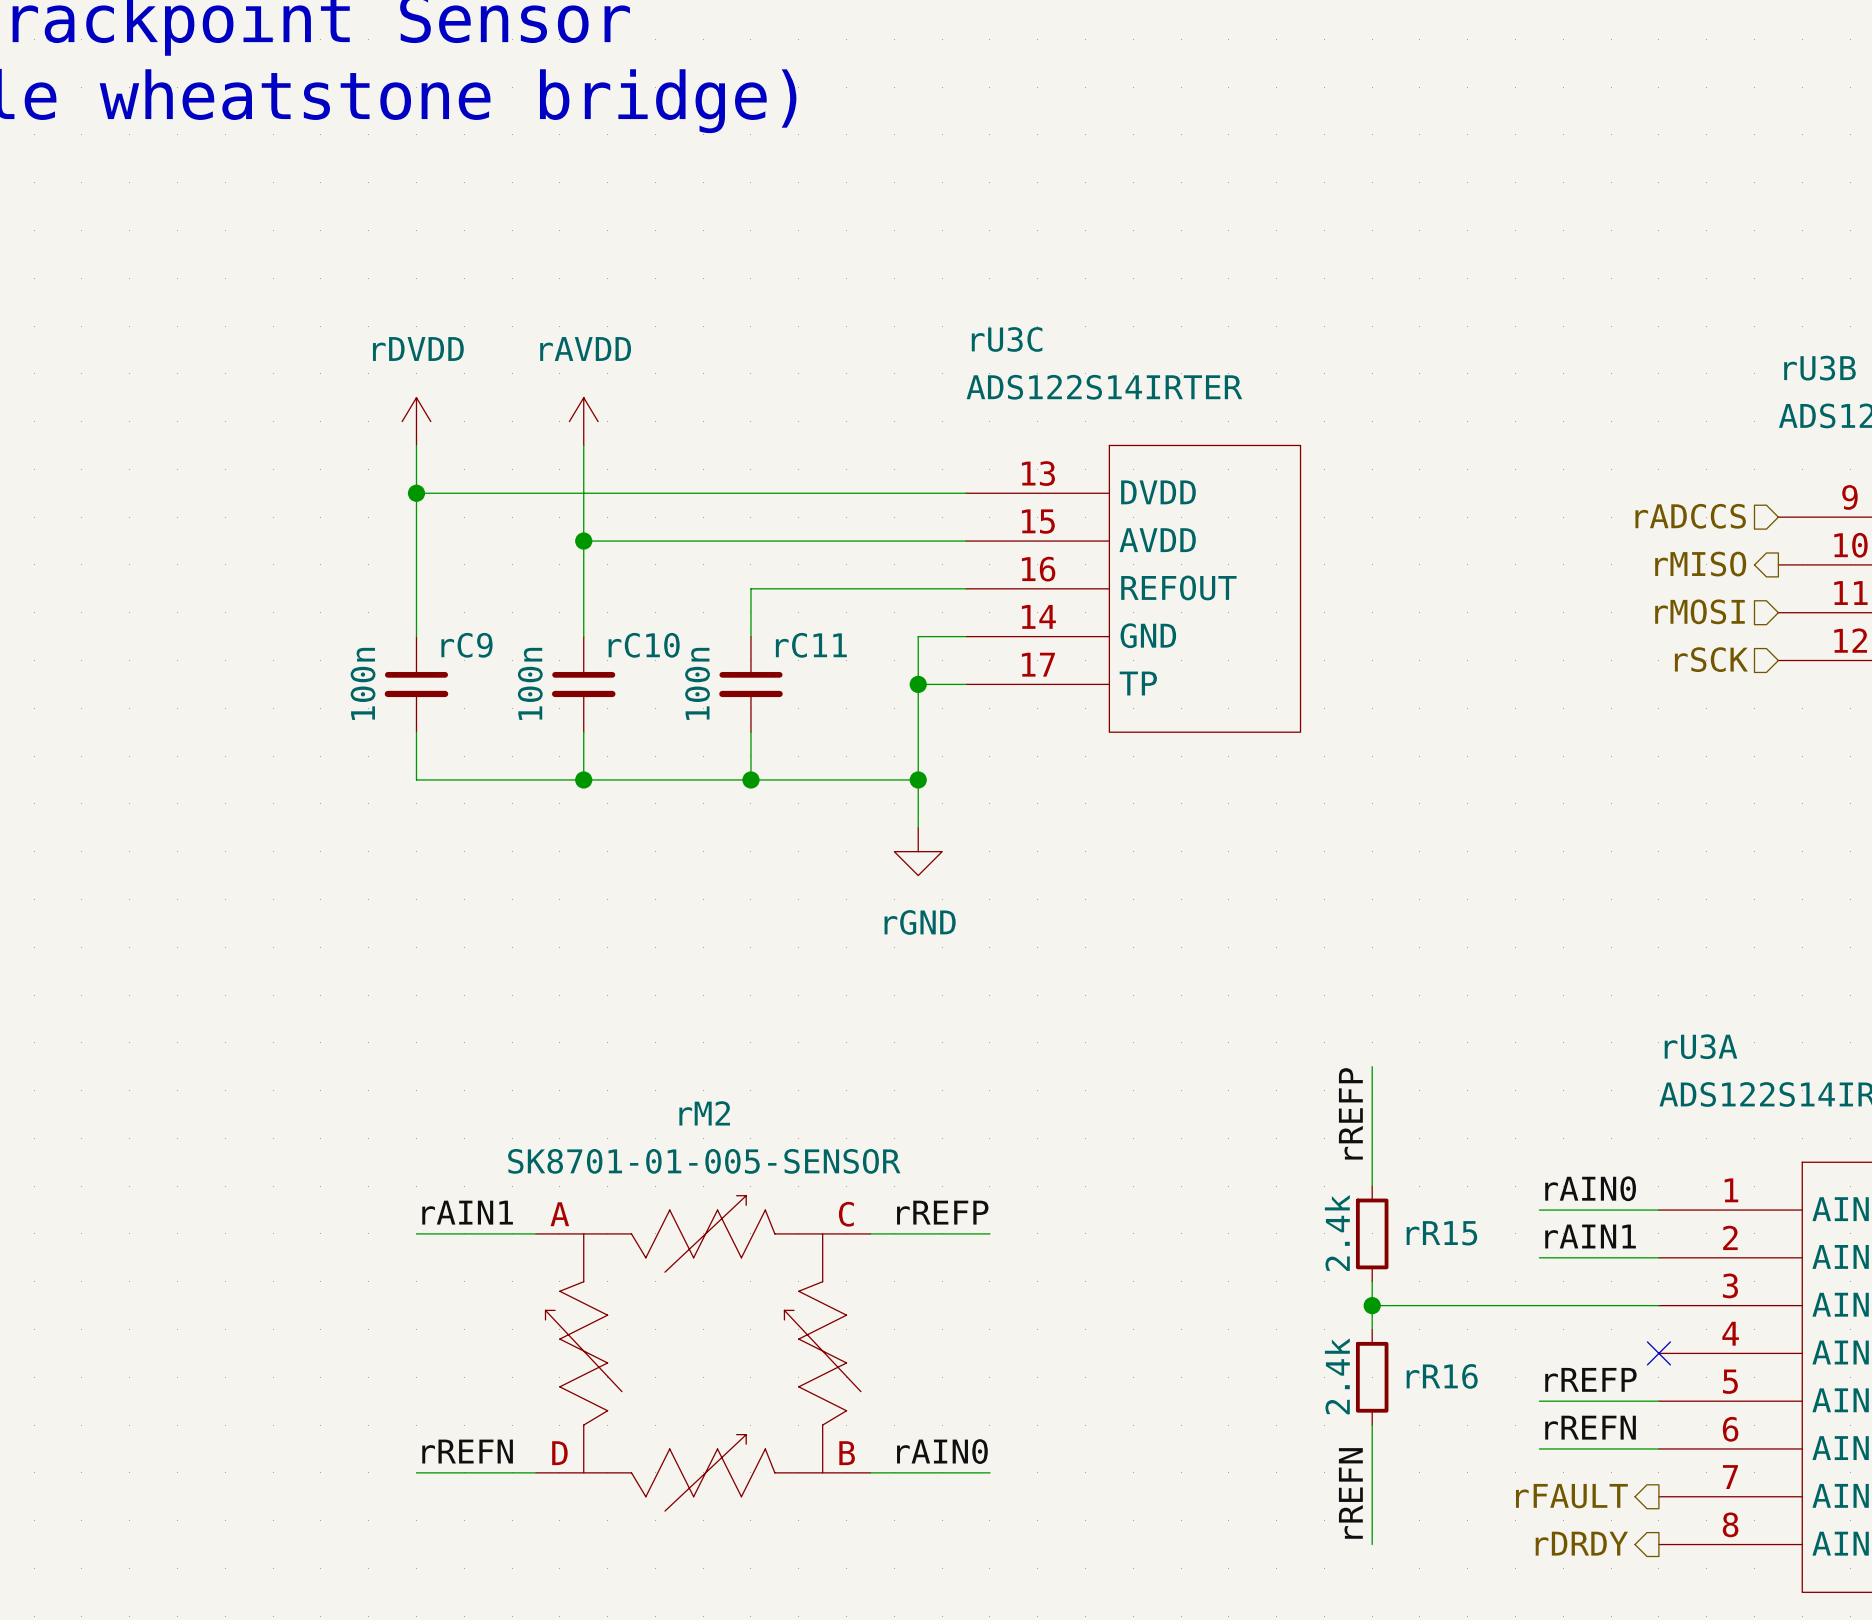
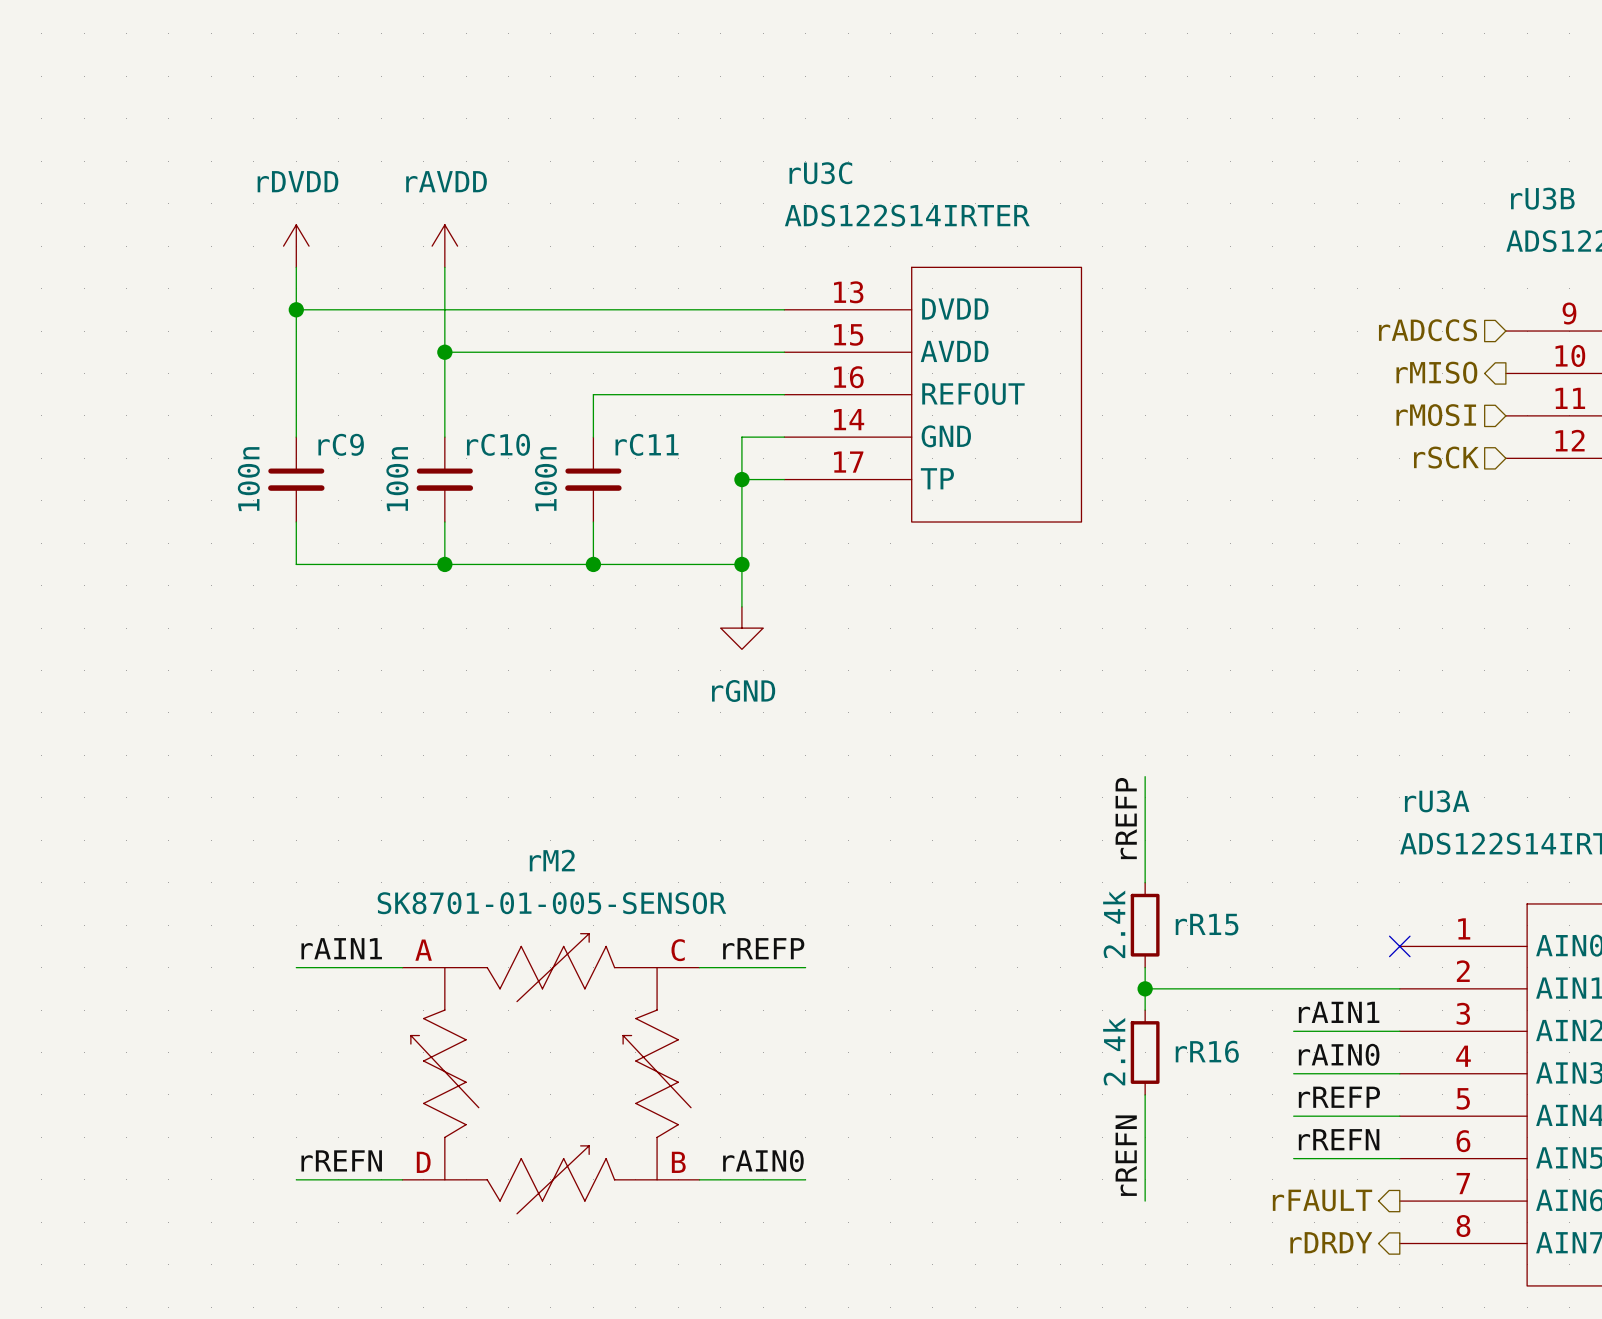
label position: rREFP (1350, 1113) -> rREFP (1126, 818)
wire: (1372, 1138) (1372, 1186) -> (1145, 776) (1145, 819)
label position: rAIN0 (1590, 1188) -> rAIN0 (1339, 1054)
wire: (1539, 1210) (1658, 1210) -> (1293, 1073) (1399, 1073)
no-connect mark: none -> (1399, 946)
rR15 position: (1372, 1233) -> (1145, 925)
label position: rAIN1 (1590, 1236) -> rAIN1 (1339, 1012)
wire: (1372, 1281) (1372, 1329) -> (1145, 1010) (1145, 967)
wire: (1372, 1305) (1539, 1305) -> (1145, 988) (1293, 988)
junction position: (1372, 1305) -> (1145, 988)
no-connect mark: (1658, 1353) -> none
rR16 position: (1372, 1377) -> (1145, 1052)
label position: rREFN (1350, 1493) -> rREFN (1126, 1155)
wire: (1372, 1496) (1372, 1544) -> (1145, 1094) (1145, 1137)

